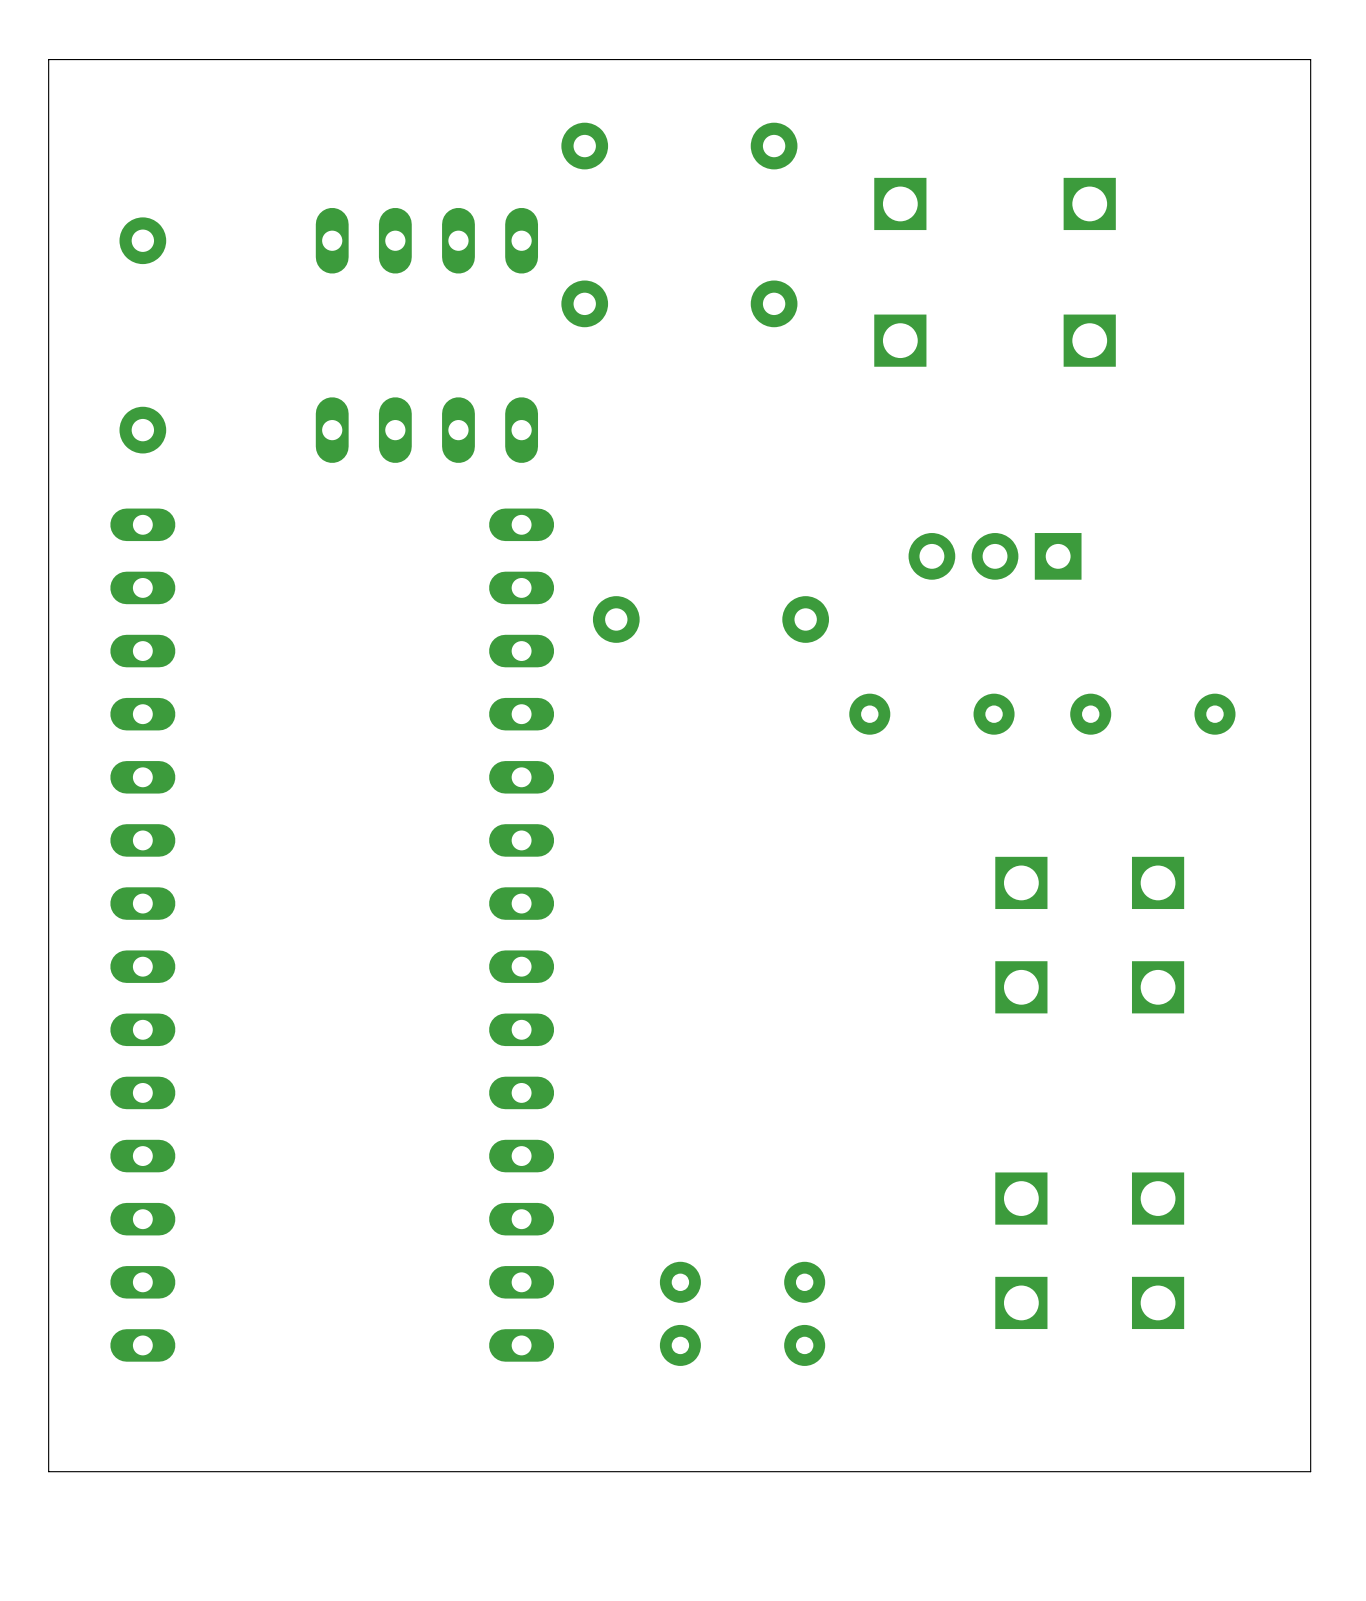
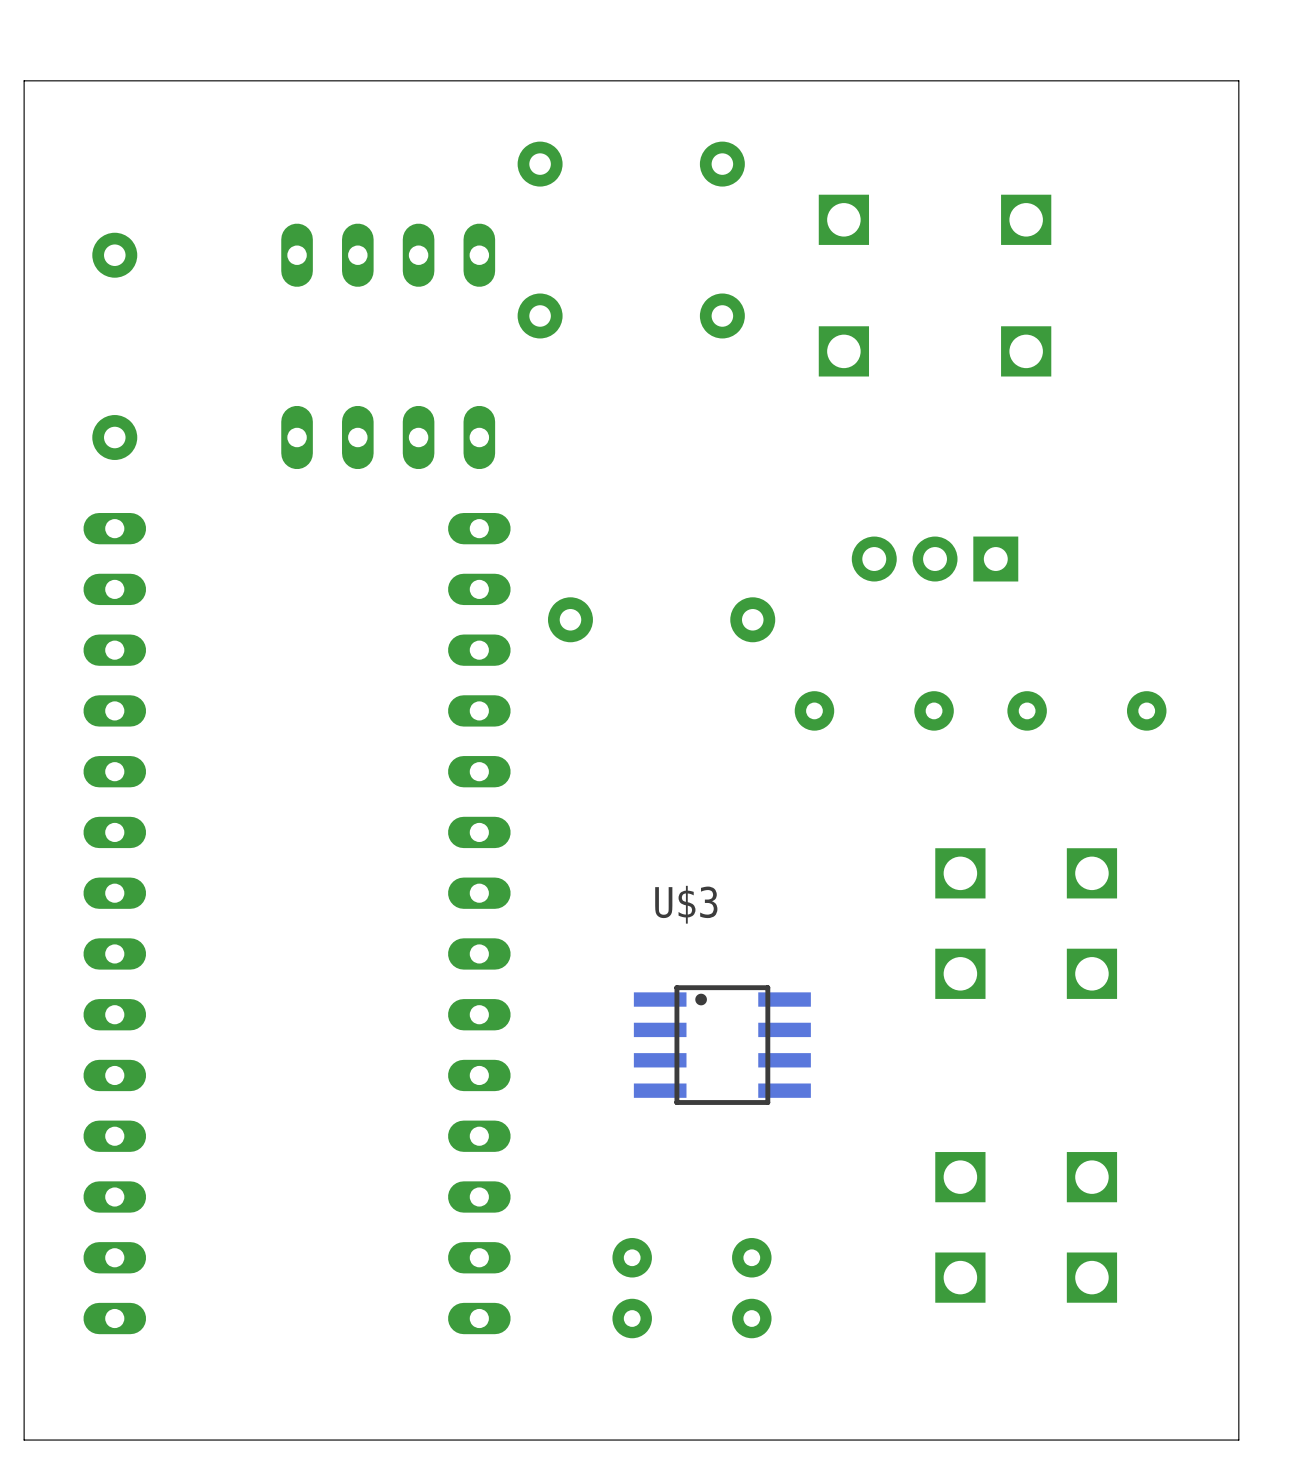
U$3: none -> (722, 1045)

